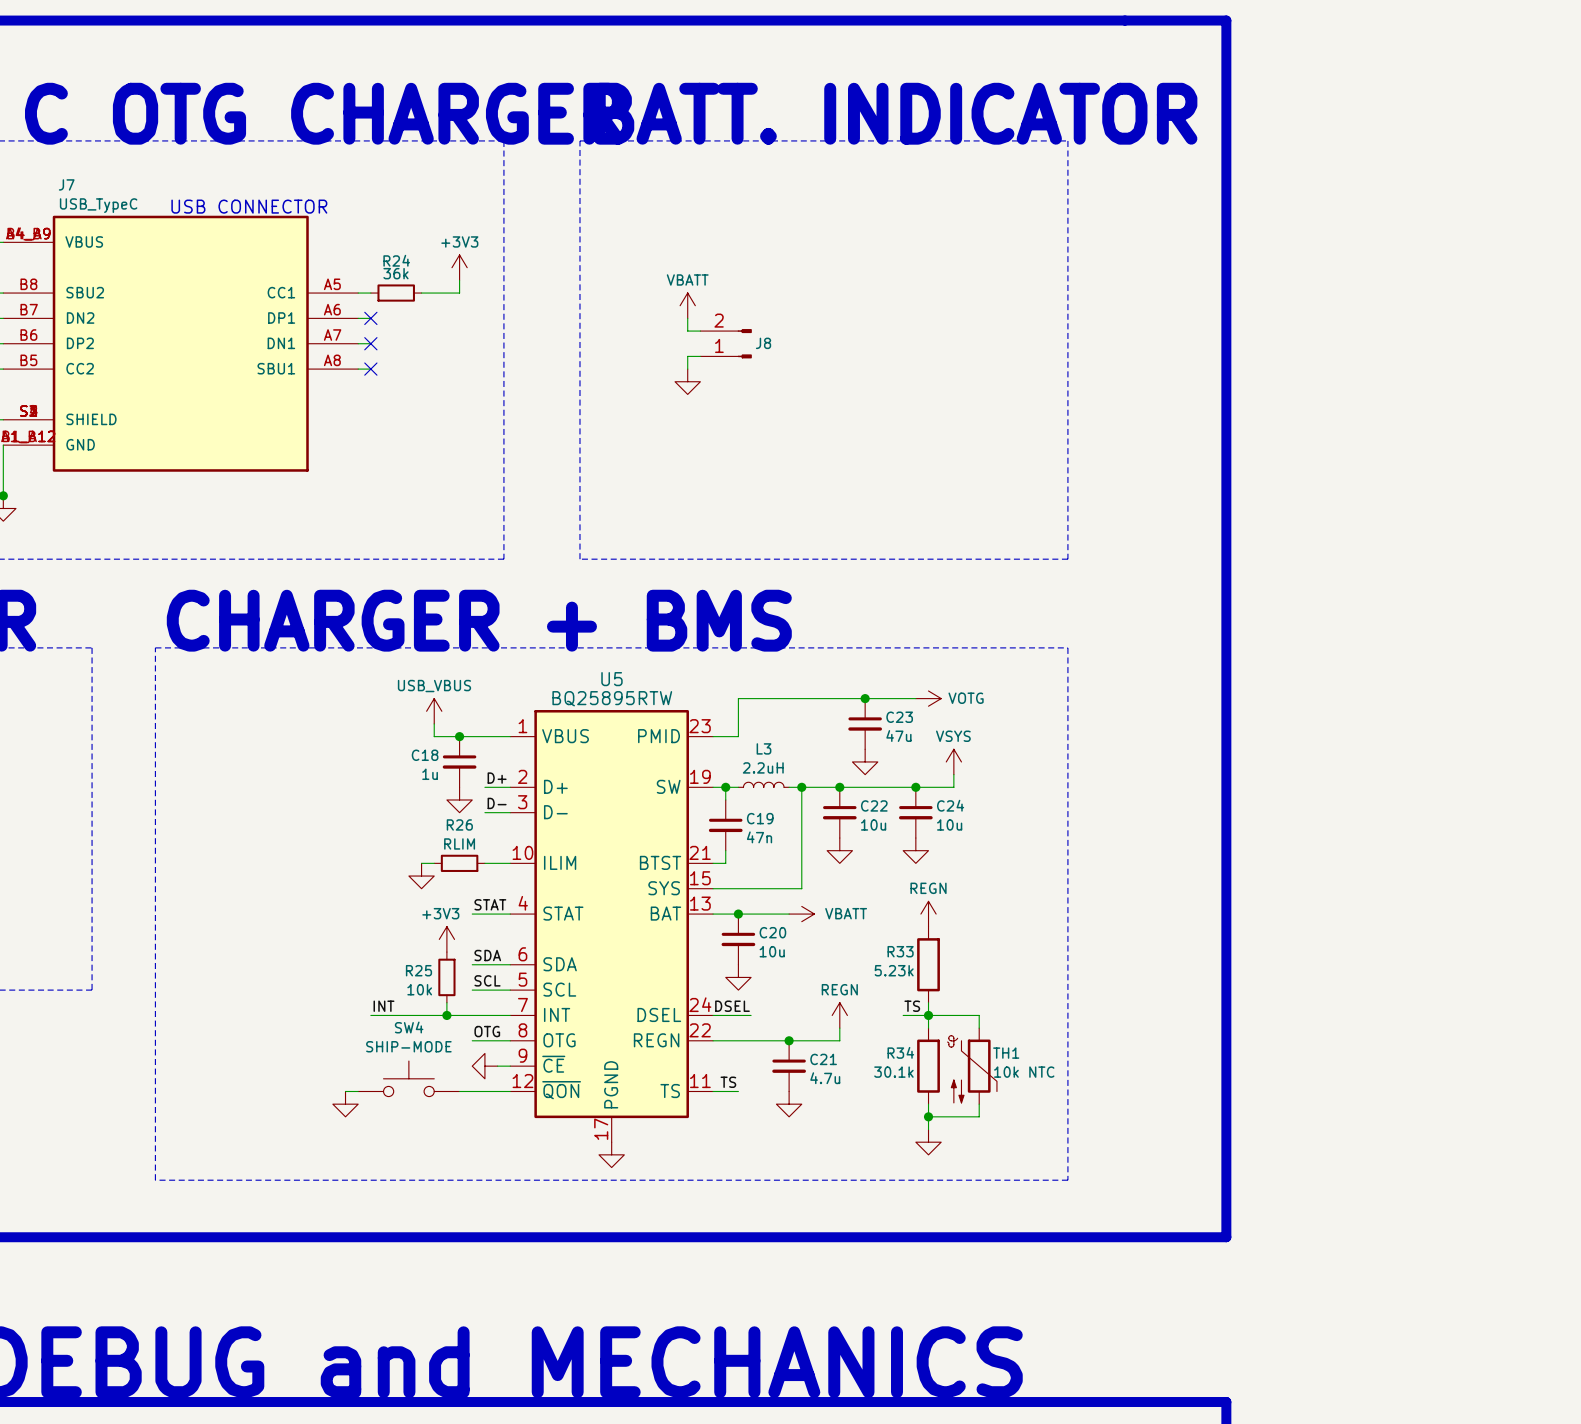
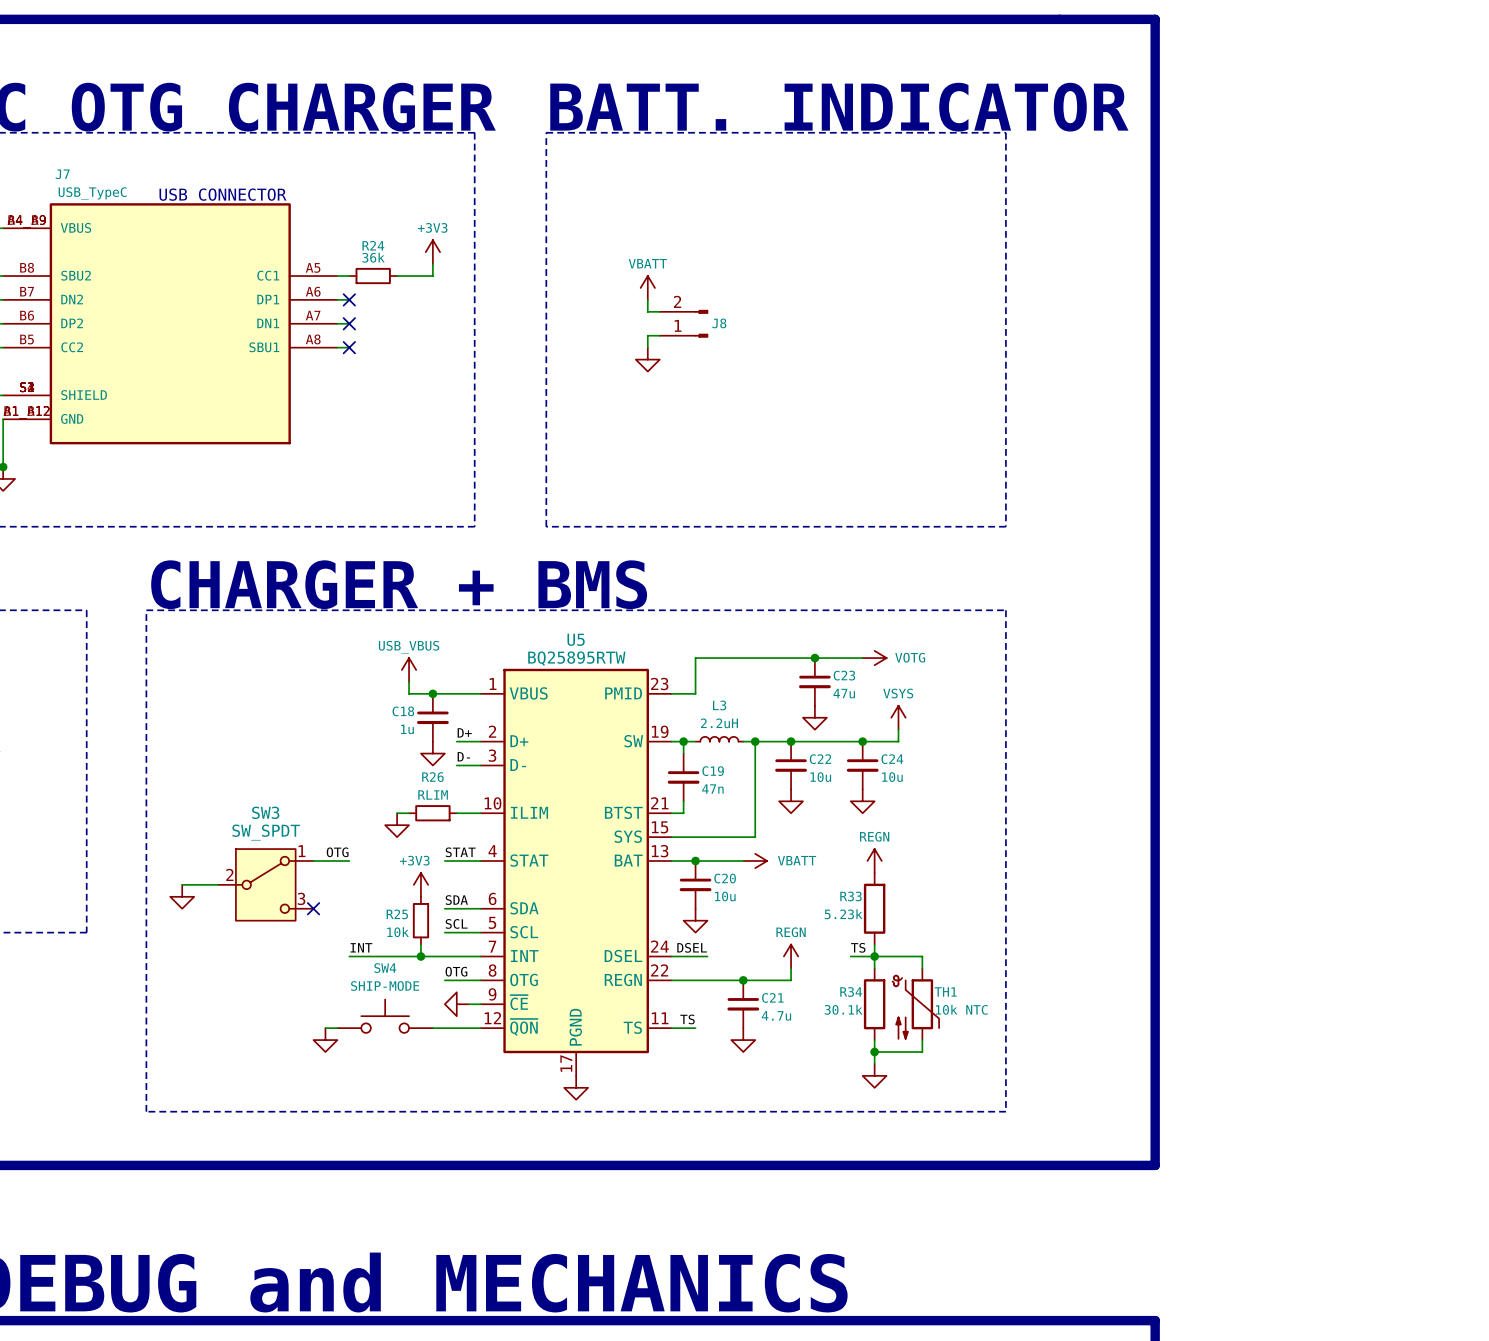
label: none -> OTG (337, 852)
wire: none -> (313, 860) (349, 860)
wire: none -> (182, 884) (218, 884)
SW3: none -> SW_SPDT (265, 884)
power symbol: none -> (182, 896)
no-connect mark: none -> (313, 908)

